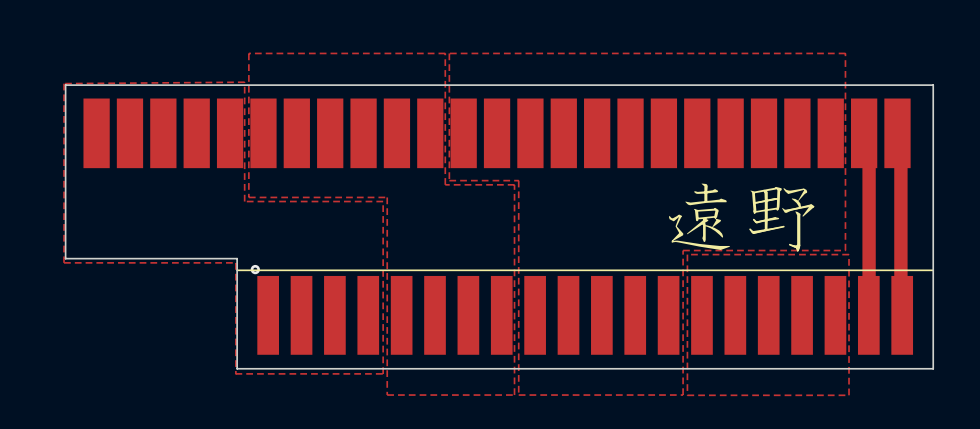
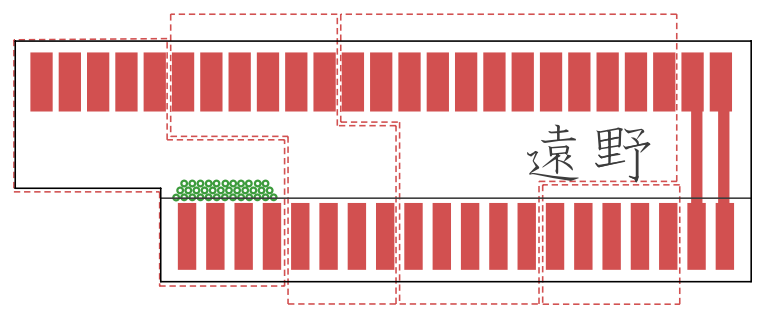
via: none -> (184, 183)
via: none -> (192, 183)
via: none -> (200, 183)
via: none -> (208, 183)
via: none -> (216, 183)
via: none -> (225, 183)
via: none -> (233, 183)
via: none -> (241, 183)
via: none -> (248, 183)
via: none -> (257, 183)
via: none -> (265, 183)
via: none -> (180, 190)
via: none -> (188, 190)
via: none -> (196, 190)
via: none -> (204, 190)
via: none -> (212, 190)
via: none -> (220, 190)
via: none -> (228, 190)
via: none -> (237, 190)
via: none -> (245, 190)
via: none -> (253, 190)
via: none -> (261, 190)
via: none -> (269, 190)
via: none -> (184, 197)
via: none -> (192, 197)
via: none -> (200, 197)
via: none -> (208, 197)
via: none -> (216, 197)
via: none -> (224, 197)
via: none -> (232, 197)
via: none -> (241, 197)
via: none -> (249, 197)
via: none -> (257, 197)
via: none -> (265, 197)
via: none -> (273, 197)

